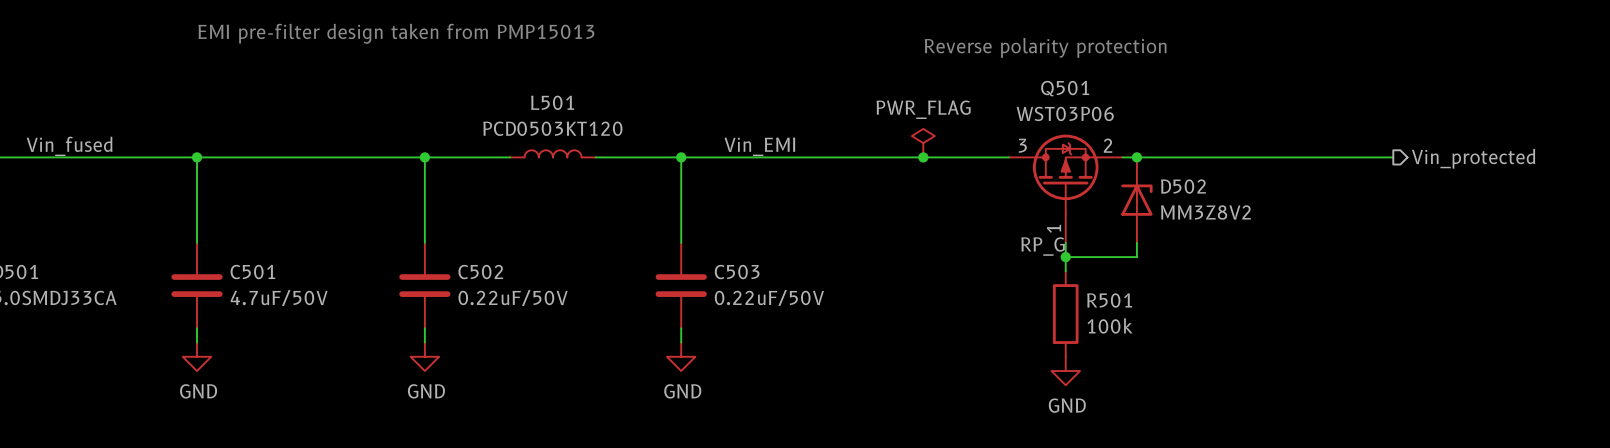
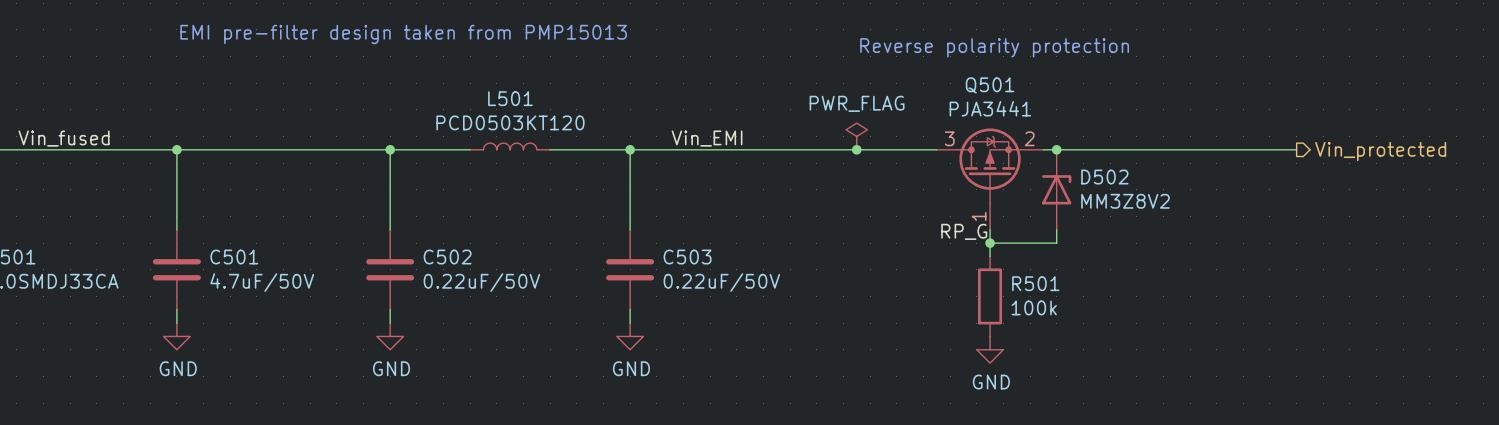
Q501 value: WST03P06 (1065, 113) -> PJA3441 (990, 108)

